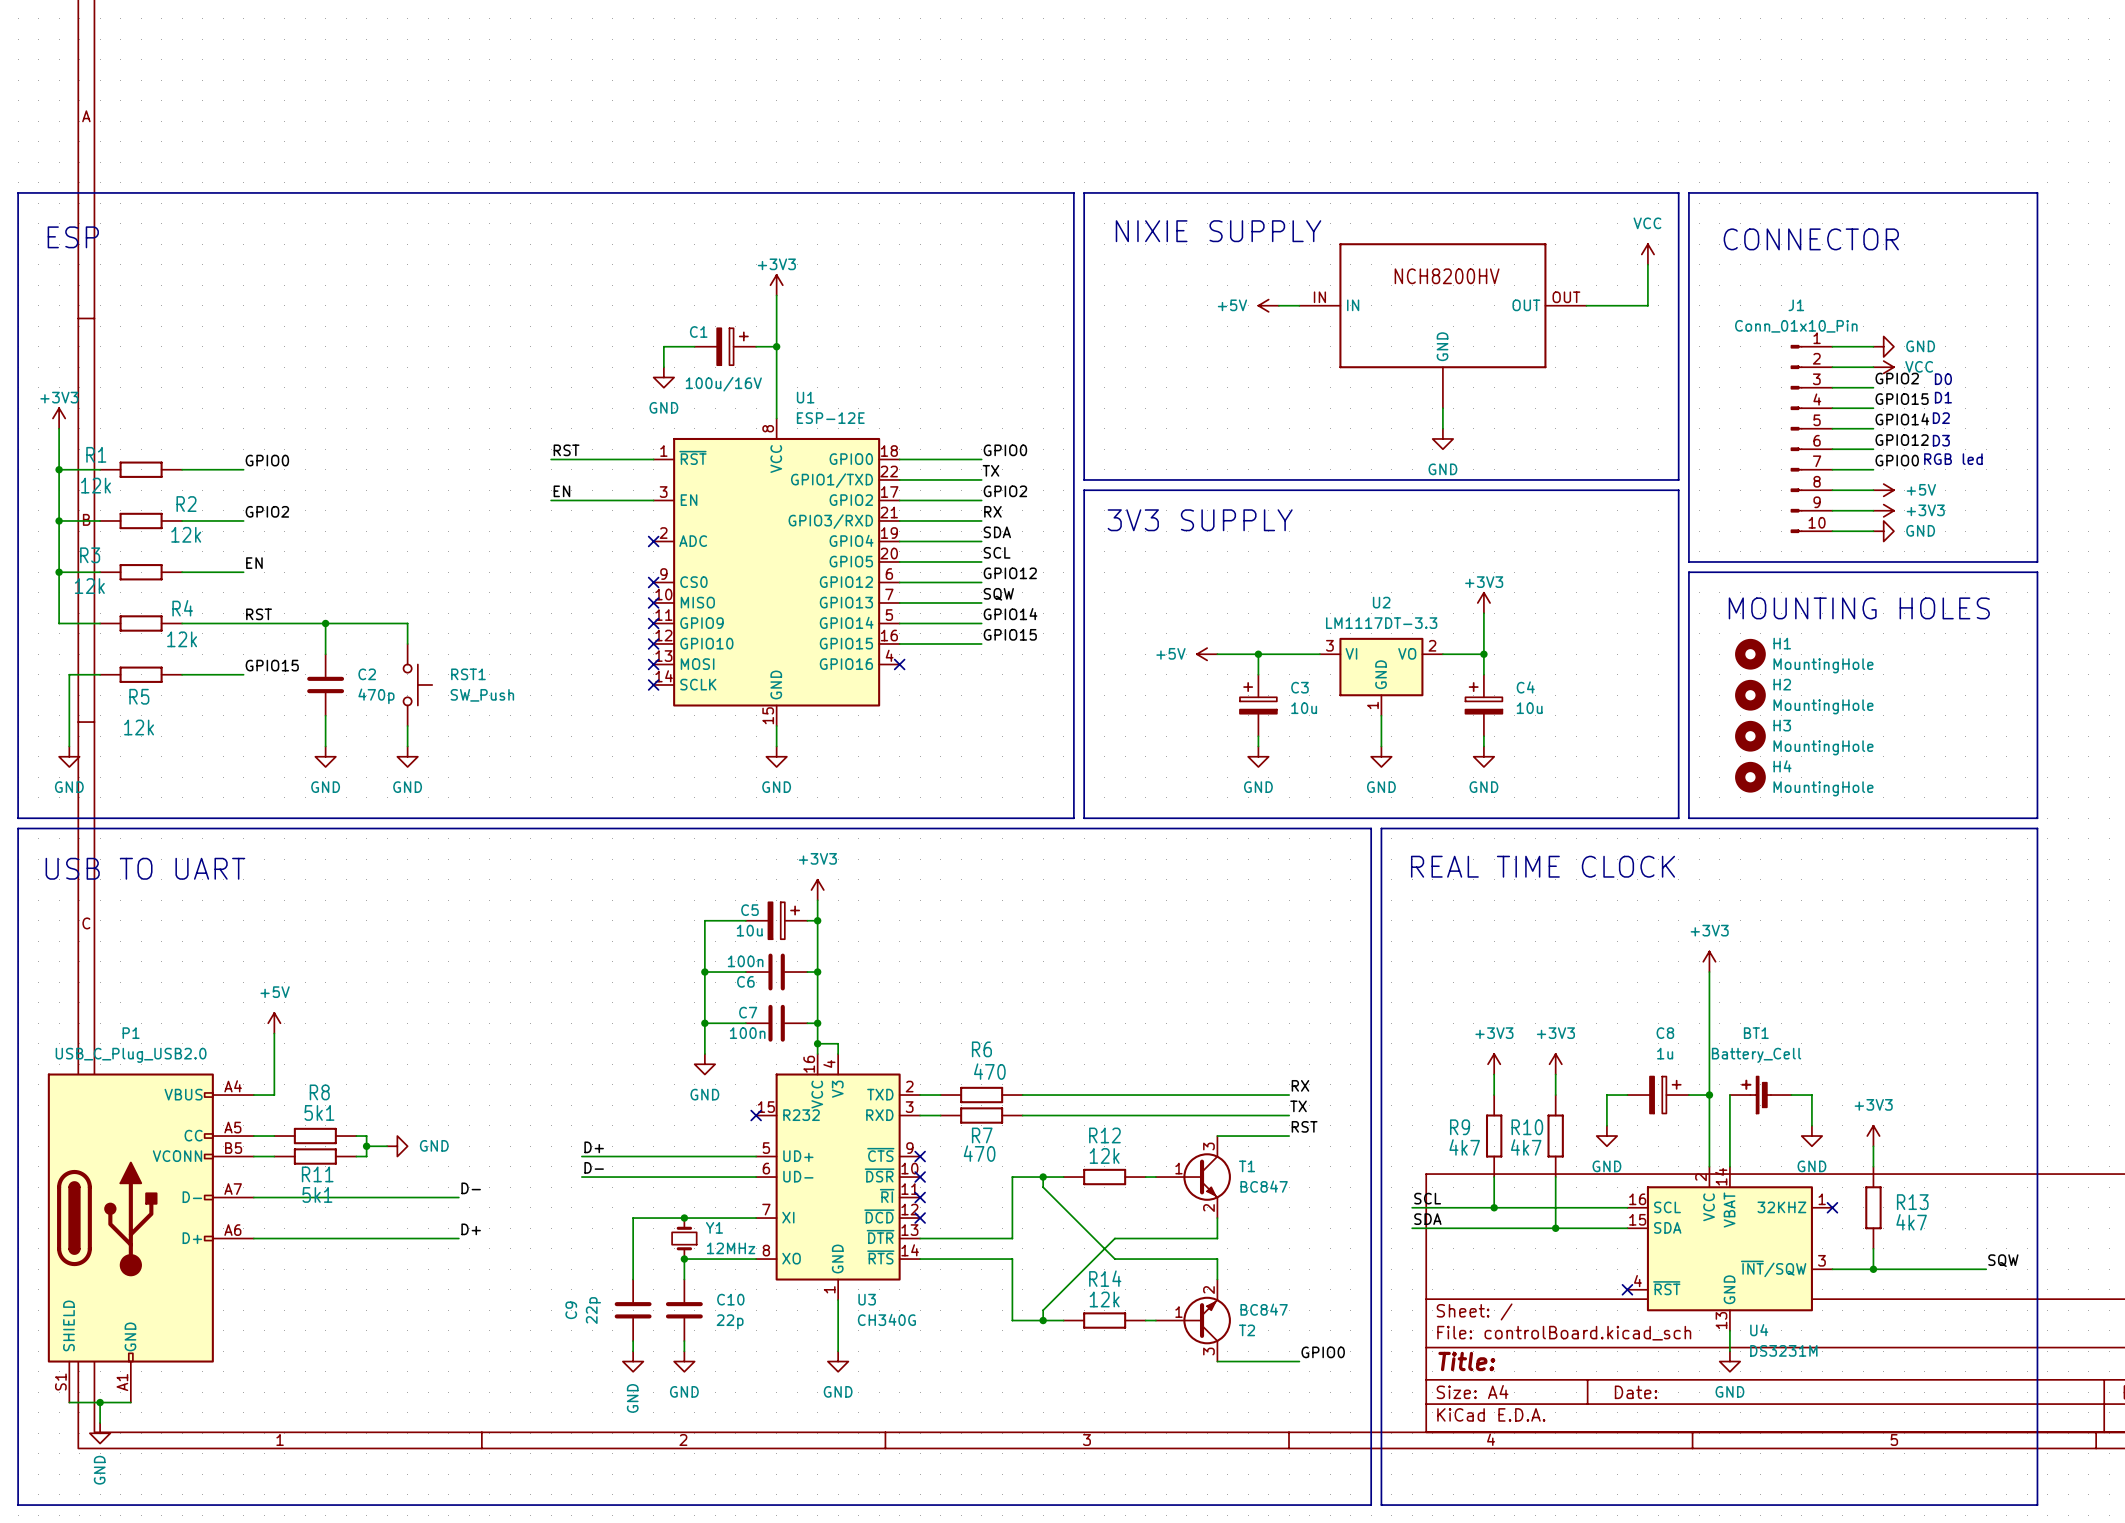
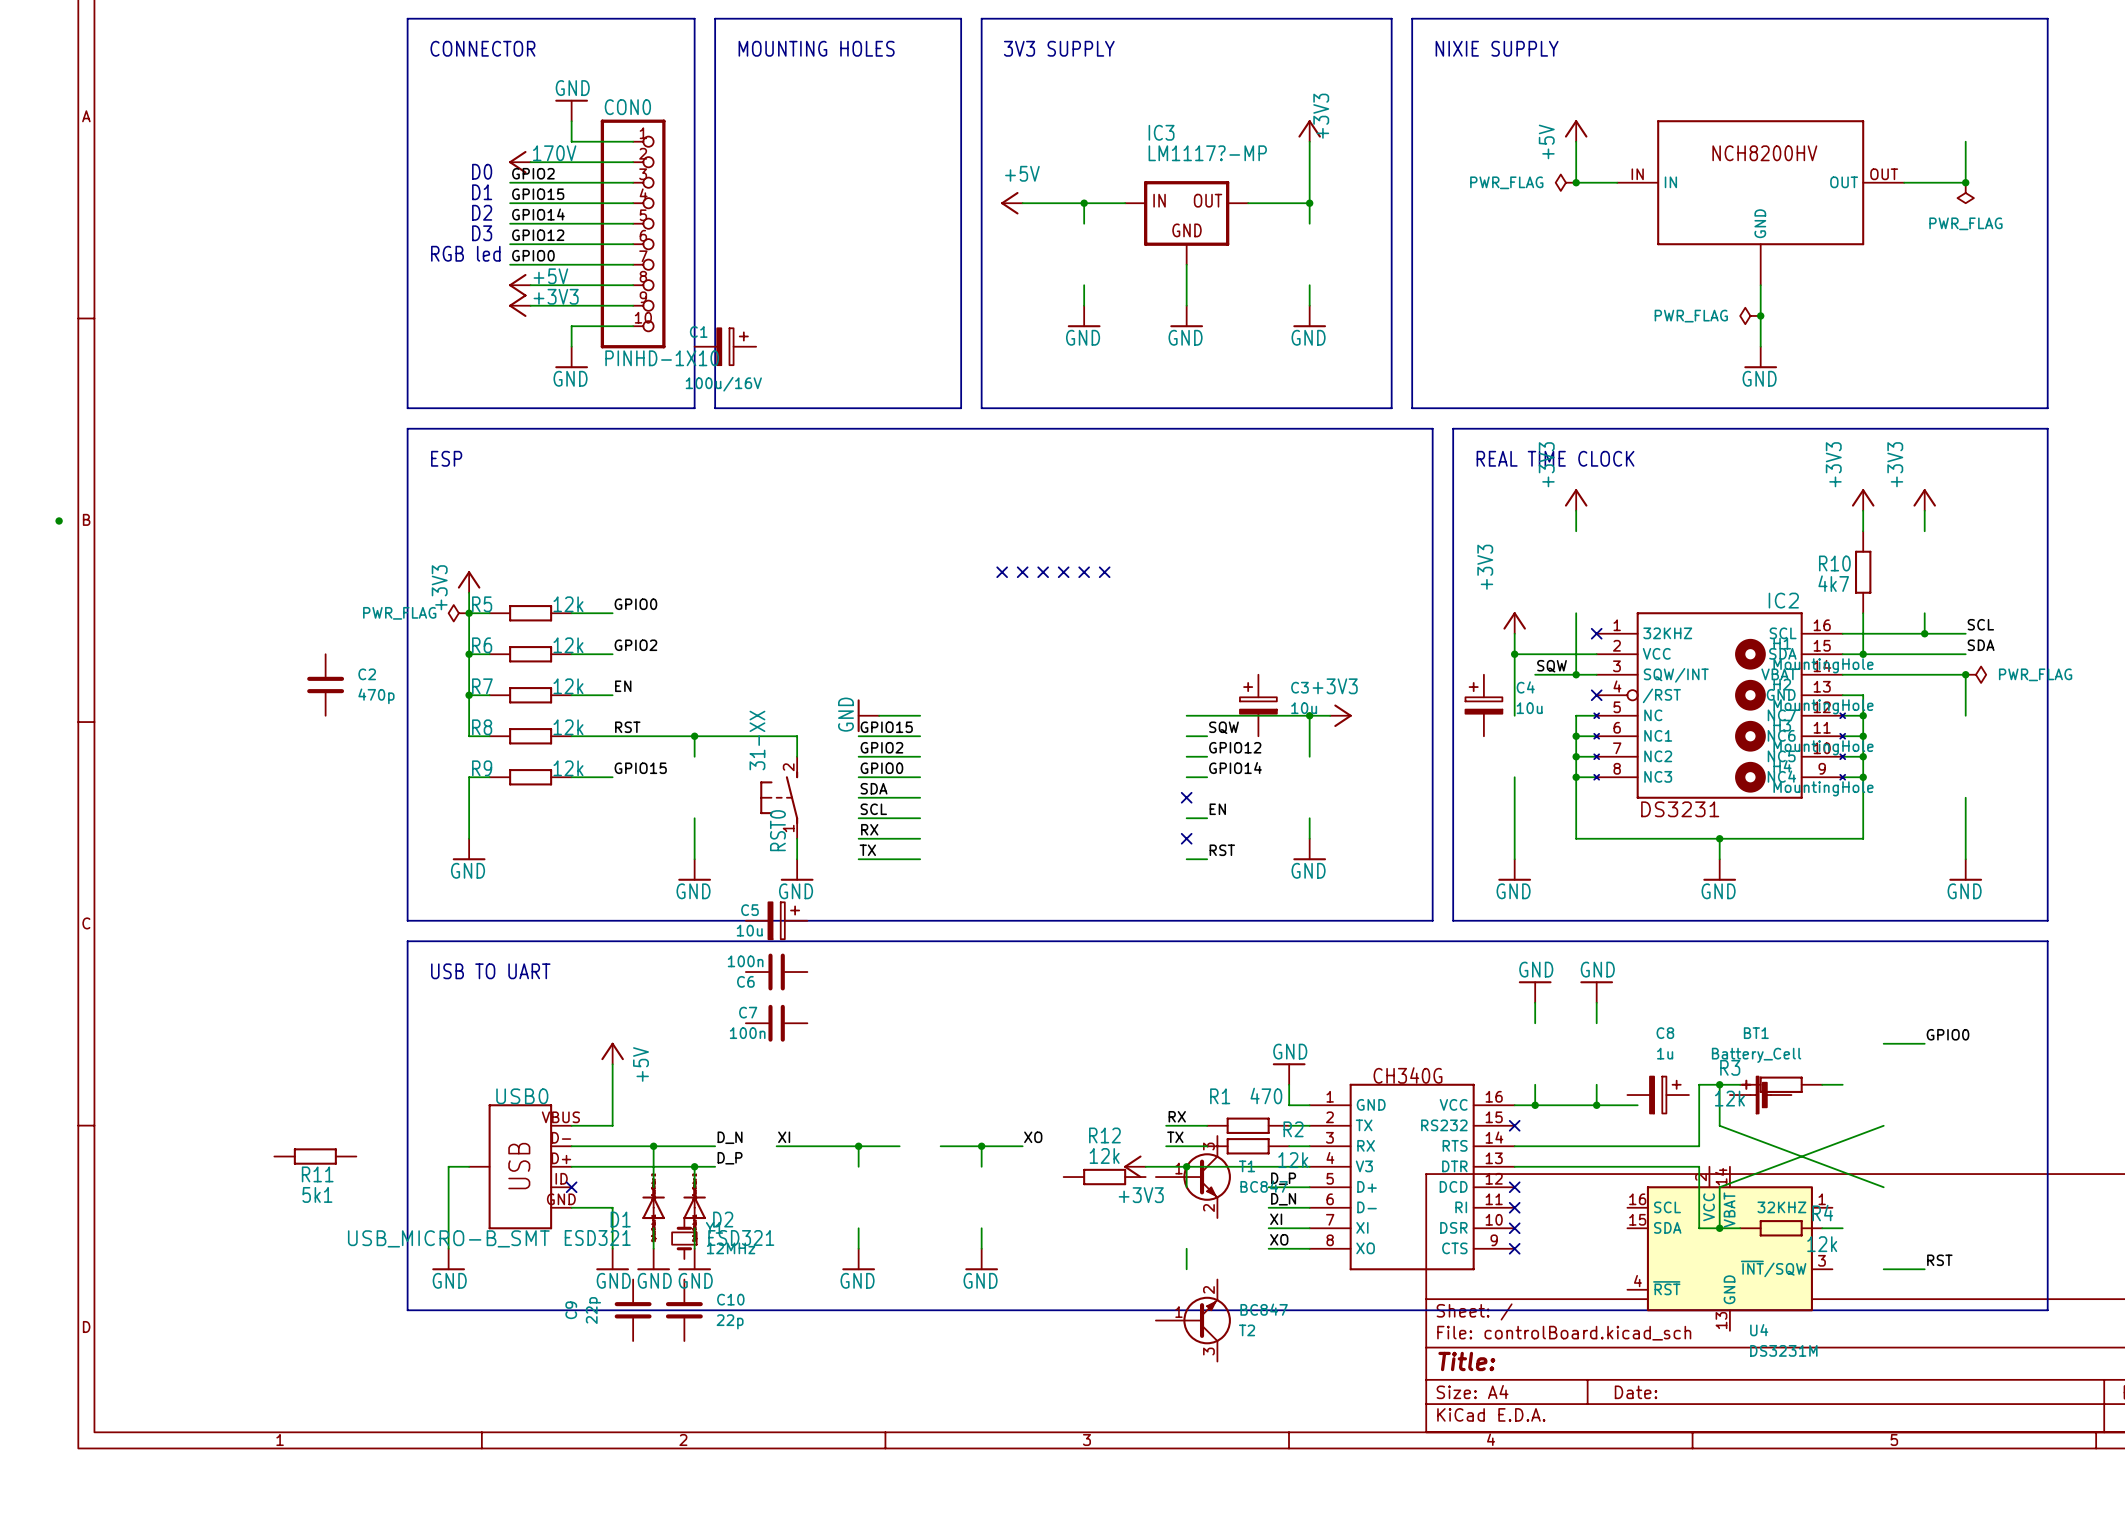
line: none -> (407, 18) (694, 18) (694, 408) (407, 408) (407, 18)
line: none -> (715, 18) (715, 408) (961, 408) (961, 18) (715, 18)
line: none -> (981, 18) (981, 408) (1391, 408) (1391, 18) (981, 18)
line: none -> (1412, 18) (2047, 18) (2047, 408) (1412, 408) (1412, 18)
text: none -> CONNECTOR (482, 48)
text: none -> MOUNTING HOLES (816, 48)
text: none -> 3V3 SUPPLY (1059, 48)
text: none -> NIXIE SUPPLY (1497, 48)
power symbol: none -> GND (571, 110)
wire: none -> (571, 121) (571, 141) (633, 141)
power symbol: none -> +3V3 (1309, 130)
power symbol: none -> +5V (1576, 130)
wire: none -> (1309, 141) (1309, 223)
wire: none -> (1576, 141) (1576, 182) (1617, 182)
wire: none -> (1965, 141) (1965, 182) (1904, 182)
power symbol: none -> 170V (519, 162)
wire: none -> (530, 162) (633, 162)
text: none -> D0 (482, 171)
label: none -> GPIO2 (533, 173)
wire: none -> (510, 182) (633, 182)
power symbol: none -> PWR_FLAG (1565, 182)
junction: none -> (1576, 182)
junction: none -> (1965, 182)
line: (18, 192) (1073, 192) (1073, 818) (18, 818) (18, 192) -> none
text: none -> D1 (482, 192)
line: (1084, 192) (1678, 192) (1678, 479) (1084, 479) (1084, 192) -> none
line: (1688, 192) (2037, 192) (2037, 561) (1688, 561) (1688, 192) -> none
power symbol: none -> PWR_FLAG (1965, 192)
label: none -> GPIO15 (538, 194)
part: none -> (1760, 202)
wire: none -> (510, 203) (633, 203)
power symbol: none -> +5V (1011, 203)
wire: none -> (1022, 203) (1125, 203)
junction: none -> (1084, 203)
wire: none -> (1248, 203) (1309, 203)
junction: none -> (1309, 203)
text: none -> D2 (482, 212)
label: none -> GPIO14 (538, 214)
IC3: none -> LM1117?-MP (1186, 222)
wire: none -> (510, 223) (633, 223)
text: NIXIE SUPPLY (1218, 231) -> none
text: none -> D3 (482, 233)
CON0: none -> PINHD-1X10 (633, 233)
label: none -> GPIO12 (538, 235)
text: ESP (73, 237) -> none
text: CONNECTOR (1811, 239) -> none
wire: none -> (510, 244) (633, 244)
text: none -> RGB led (465, 253)
power symbol: VCC (1647, 254) -> none
label: none -> GPIO0 (533, 255)
wire: none -> (510, 264) (633, 264)
wire: none -> (1186, 264) (1186, 305)
wire: (1647, 264) (1647, 305) (1586, 305) -> none
power symbol: none -> +5V (519, 285)
wire: none -> (530, 285) (633, 285)
power symbol: +3V3 (776, 285) -> none
wire: none -> (1309, 285) (1309, 305)
wire: none -> (1760, 285) (1760, 346)
wire: (776, 295) (776, 418) -> none
power symbol: none -> +3V3 (519, 305)
power symbol: +5V (1268, 305) -> none
wire: (1278, 305) (1299, 305) -> none
power symbol: none -> PWR_FLAG (1750, 315)
junction: none -> (1760, 315)
power symbol: none -> GND (1084, 316)
power symbol: none -> GND (1186, 316)
power symbol: none -> GND (1309, 316)
part: (1442, 325) -> none
wire: none -> (633, 326) (571, 326) (571, 346)
wire: (694, 346) (663, 346) (663, 367) -> none
wire: (756, 346) (776, 346) -> none
junction: (776, 346) -> none
wire: (1832, 346) (1873, 346) -> none
power symbol: GND (1883, 346) -> none
power symbol: none -> GND (571, 357)
power symbol: none -> GND (1760, 357)
wire: (1832, 367) (1873, 367) -> none
power symbol: VCC (1883, 367) -> none
power symbol: GND (663, 377) -> none
label: GPIO2 (1897, 378) -> none
text: D0 (1943, 379) -> none
wire: (1832, 387) (1873, 387) -> none
text: D1 (1943, 397) -> none
label: GPIO15 (1902, 399) -> none
wire: (1442, 408) (1442, 428) -> (1576, 510) (1576, 531)
power symbol: +3V3 (59, 418) -> none
text: D2 (1941, 418) -> none
label: GPIO14 (1902, 419) -> none
wire: (59, 428) (59, 623) (100, 623) -> none
line: none -> (407, 428) (1432, 428) (1432, 920) (407, 920) (407, 428)
line: none -> (1453, 428) (2047, 428) (2047, 920) (1453, 920) (1453, 428)
power symbol: GND (1442, 438) -> none
J1: Conn_01x10_Pin (1811, 438) -> none
label: GPIO12 (1902, 440) -> none
text: D3 (1941, 440) -> none
wire: (1832, 449) (1873, 449) -> none
label: RST (566, 450) -> none
label: GPIO0 (1005, 450) -> none
R1 name position: R1 (96, 454) -> R1 (1220, 1096)
text: none -> ESP (446, 458)
text: none -> REAL TIME CLOCK (1555, 458)
wire: (551, 459) (653, 459) -> (530, 305) (633, 305)
wire: (899, 459) (981, 459) -> none
text: RGB led (1953, 459) -> none
label: GPIO0 (267, 460) -> none
label: GPIO0 (1897, 460) -> none
wire: (59, 469) (100, 469) -> none
junction: (59, 469) -> none
R1 position: (141, 469) -> (1248, 1125)
wire: (182, 469) (243, 469) -> none
wire: (1832, 469) (1873, 469) -> none
label: TX (991, 470) -> none
wire: (899, 479) (981, 479) -> none
R1 value: 12k (95, 485) -> 470 (1266, 1095)
line: (1084, 490) (1084, 818) (1678, 818) (1678, 490) (1084, 490) -> none
wire: (1832, 490) (1873, 490) -> none
power symbol: +5V (1883, 490) -> none
label: EN (561, 491) -> none
label: GPIO2 (1005, 491) -> none
power symbol: none -> +3V3 (1576, 499)
power symbol: none -> +3V3 (1863, 499)
power symbol: none -> +3V3 (1924, 499)
wire: (551, 500) (653, 500) -> none
wire: (899, 500) (981, 500) -> none
wire: (1832, 510) (1873, 510) -> none
wire: none -> (1863, 510) (1863, 531)
power symbol: +3V3 (1883, 510) -> none
wire: none -> (1924, 510) (1924, 531)
label: GPIO2 (267, 511) -> none
label: RX (992, 511) -> none
wire: (59, 520) (100, 520) -> none
R2 position: (141, 520) -> (1248, 1146)
wire: (182, 520) (243, 520) -> none
wire: (899, 520) (981, 520) -> none
text: 3V3 SUPPLY (1200, 520) -> none
wire: (1832, 531) (1873, 531) -> none
power symbol: GND (1883, 531) -> none
label: SDA (997, 532) -> none
no-connect mark: (653, 541) -> none
wire: (899, 541) (981, 541) -> none
label: SCL (997, 552) -> none
wire: (899, 561) (981, 561) -> none
label: EN (254, 563) -> none
wire: (59, 572) (100, 572) -> none
junction: (59, 572) -> none
R3 position: (141, 572) -> (1781, 1084)
wire: (182, 572) (243, 572) -> none
U1: ESP-12E (776, 572) -> none
no-connect mark: none -> (1002, 572)
no-connect mark: none -> (1022, 572)
no-connect mark: none -> (1043, 572)
no-connect mark: none -> (1063, 572)
no-connect mark: none -> (1084, 572)
no-connect mark: none -> (1104, 572)
line: (1688, 572) (1688, 818) (2037, 818) (2037, 572) (1688, 572) -> none
label: GPIO12 (1010, 573) -> none
power symbol: none -> +3V3 (469, 581)
no-connect mark: (653, 582) -> none
wire: (899, 582) (981, 582) -> none
wire: none -> (469, 592) (469, 736) (489, 736)
label: SQW (998, 594) -> none
no-connect mark: (653, 602) -> none
wire: (899, 602) (981, 602) -> none
power symbol: +3V3 (1483, 602) -> none
label: none -> GPIO0 (635, 604)
text: MOUNTING HOLES (1859, 608) -> none
power symbol: none -> PWR_FLAG (458, 613)
wire: none -> (469, 613) (489, 613)
junction: none -> (469, 613)
wire: none -> (571, 613) (612, 613)
wire: (1483, 613) (1483, 674) -> (1576, 613) (1576, 674)
wire: none -> (1863, 613) (1863, 654)
wire: none -> (1924, 613) (1924, 633)
label: RST (259, 614) -> none
label: GPIO14 (1010, 614) -> none
power symbol: none -> +3V3 (1514, 622)
R4 position: (141, 623) -> (1781, 1228)
wire: (182, 623) (407, 623) (407, 643) -> none
wire: (325, 623) (325, 654) -> none
junction: (325, 623) -> none
no-connect mark: (653, 623) -> none
wire: (899, 623) (981, 623) -> none
label: none -> SCL (1980, 624)
wire: none -> (1514, 633) (1514, 715)
no-connect mark: none -> (1596, 633)
wire: none -> (1842, 633) (1965, 633)
junction: none -> (1924, 633)
label position: GPIO15 (1010, 634) -> GPIO15 (886, 727)
no-connect mark: (653, 643) -> none
wire: (899, 643) (981, 643) -> none
label: none -> GPIO2 (635, 645)
label: none -> SDA (1981, 645)
wire: none -> (469, 654) (489, 654)
junction: none -> (469, 654)
wire: none -> (571, 654) (612, 654)
power symbol: +5V (1207, 654) -> none
wire: (1217, 654) (1319, 654) -> none
wire: (1258, 654) (1258, 674) -> (1309, 818) (1309, 838)
junction: (1258, 654) -> none
wire: (1442, 654) (1483, 654) -> none
junction position: (1483, 654) -> (1514, 654)
wire: none -> (1514, 654) (1596, 654)
wire: none -> (1842, 654) (1965, 654)
junction: none -> (1863, 654)
no-connect mark: (653, 664) -> none
no-connect mark: (899, 664) -> none
label: GPIO15 (272, 665) -> none
label: none -> SQW (1552, 666)
wire: (100, 674) (69, 674) (69, 746) -> none
R5 position: (141, 674) -> (530, 613)
wire: (182, 674) (243, 674) -> none
wire: none -> (1535, 674) (1596, 674)
junction: none -> (1576, 674)
wire: none -> (1842, 674) (1965, 674) (1965, 715)
junction: none -> (1965, 674)
power symbol: none -> PWR_FLAG (1975, 674)
U2: LM1117DT-3.3 (1381, 676) -> none
RST1: SW_Push (417, 684) -> none
no-connect mark: (653, 684) -> none
label: none -> EN (623, 686)
wire: none -> (469, 695) (489, 695)
junction: none -> (469, 695)
wire: none -> (571, 695) (612, 695)
no-connect mark: none -> (1596, 695)
wire: none -> (1842, 695) (1863, 695) (1863, 838) (1576, 838) (1576, 715) (1596, 715)
R5 name position: R5 (139, 696) -> R5 (482, 604)
IC2: none -> (1719, 705)
wire: (325, 715) (325, 746) -> none
power symbol: none -> GND (868, 715)
wire: none -> (879, 715) (920, 715)
wire: none -> (1186, 715) (1330, 715)
wire: none -> (1309, 715) (1309, 756)
junction: none -> (1309, 715)
power symbol: none -> +3V3 (1340, 715)
wire: (1381, 715) (1381, 746) -> none
wire: none -> (1842, 715) (1863, 715)
junction: none -> (1863, 715)
wire: (776, 726) (776, 746) -> (694, 736) (694, 756)
R5 value position: 12k (139, 727) -> 12k (568, 604)
label: none -> RST (627, 727)
label: none -> SQW (1223, 727)
wire: none -> (571, 736) (797, 736) (797, 756)
junction: none -> (694, 736)
wire: none -> (858, 736) (920, 736)
wire: none -> (1186, 736) (1207, 736)
wire: (1258, 736) (1258, 746) -> none
wire: (1483, 736) (1483, 746) -> none
wire: none -> (1576, 736) (1596, 736)
junction: none -> (1576, 736)
wire: none -> (1842, 736) (1863, 736)
junction: none -> (1863, 736)
label: none -> GPIO2 (881, 747)
label: none -> GPIO12 (1235, 747)
power symbol: GND (69, 756) -> none
power symbol: GND (325, 756) -> none
power symbol: GND (407, 756) -> none
power symbol: GND (776, 756) -> none
wire: none -> (858, 756) (920, 756)
wire: none -> (1186, 756) (1207, 756)
power symbol: GND (1258, 756) -> none
power symbol: GND (1381, 756) -> none
power symbol: GND (1483, 756) -> none
wire: none -> (1576, 756) (1596, 756)
junction: none -> (1576, 756)
wire: none -> (1842, 756) (1863, 756)
junction: none -> (1863, 756)
label: none -> GPIO15 (640, 768)
label: none -> GPIO0 (881, 768)
label: none -> GPIO14 (1235, 768)
wire: none -> (489, 777) (469, 777) (469, 838)
wire: none -> (571, 777) (612, 777)
wire: none -> (858, 777) (920, 777)
wire: none -> (1186, 777) (1207, 777)
wire: none -> (1514, 777) (1514, 859)
wire: none -> (1576, 777) (1596, 777)
junction: none -> (1576, 777)
wire: none -> (1842, 777) (1863, 777)
junction: none -> (1863, 777)
label: none -> SDA (874, 788)
RST0: none -> 31-XX (779, 797)
wire: none -> (858, 797) (920, 797)
no-connect mark: none -> (1186, 797)
wire: none -> (1965, 797) (1965, 859)
label: none -> SCL (873, 809)
label: none -> EN (1217, 809)
wire: none -> (694, 818) (694, 859)
line: (18, 828) (1371, 828) (1371, 1505) (18, 1505) (18, 828) -> none
line: (1381, 828) (2037, 828) (2037, 1505) (1381, 1505) (1381, 828) -> none
label: none -> RX (869, 829)
wire: none -> (797, 838) (797, 859)
wire: none -> (858, 838) (920, 838)
no-connect mark: none -> (1186, 838)
wire: none -> (1719, 838) (1719, 859)
junction: none -> (1719, 838)
power symbol: none -> GND (469, 849)
power symbol: none -> GND (1309, 849)
label: none -> TX (867, 850)
label: none -> RST (1222, 850)
wire: none -> (858, 859) (920, 859)
wire: none -> (1186, 859) (1207, 859)
text: REAL TIME CLOCK (1543, 866) -> none
text: USB TO UART (145, 868) -> none
power symbol: none -> GND (694, 870)
power symbol: none -> GND (797, 870)
power symbol: none -> GND (1514, 870)
power symbol: none -> GND (1719, 870)
power symbol: none -> GND (1965, 870)
power symbol: +3V3 (817, 890) -> none
wire: (817, 900) (817, 1054) -> none
wire: (745, 920) (704, 920) (704, 1054) -> none
junction: (817, 920) -> none
line: none -> (407, 941) (2047, 941) (2047, 1310) (407, 1310) (407, 941)
power symbol: +3V3 (1709, 961) -> none
text: none -> USB TO UART (490, 971)
wire: (704, 972) (745, 972) -> none
junction: (704, 972) -> none
wire: (807, 972) (817, 972) -> none
junction: (817, 972) -> none
wire: (1709, 972) (1709, 1166) -> none
power symbol: none -> GND (1535, 992)
power symbol: none -> GND (1596, 992)
wire: none -> (1535, 1002) (1535, 1023)
wire: none -> (1596, 1002) (1596, 1023)
power symbol: +5V (274, 1023) -> none
wire: (704, 1023) (745, 1023) -> none
junction: (704, 1023) -> none
wire: (807, 1023) (817, 1023) -> none
junction: (817, 1023) -> none
wire: (274, 1033) (274, 1095) (253, 1095) -> none
label: none -> GPIO0 (1947, 1034)
wire: (817, 1043) (838, 1043) (838, 1054) -> none
junction: (817, 1043) -> none
wire: none -> (1883, 1043) (1924, 1043)
R6 name position: R6 (981, 1049) -> R6 (482, 645)
power symbol: none -> +5V (612, 1053)
wire: none -> (612, 1064) (612, 1125) (571, 1125)
power symbol: GND (704, 1064) -> none
power symbol: +3V3 (1494, 1064) -> none
power symbol: +3V3 (1555, 1064) -> none
R6 value: 470 (989, 1071) -> 12k (568, 645)
power symbol: none -> GND (1289, 1074)
wire: (1494, 1074) (1494, 1095) -> (1535, 1084) (1535, 1105)
wire: (1555, 1074) (1555, 1095) -> (1596, 1084) (1596, 1105)
wire: none -> (1289, 1084) (1289, 1105) (1309, 1105)
wire: none -> (1719, 1084) (1719, 1125) (1883, 1187)
wire: none -> (1740, 1084) (1699, 1084) (1699, 1146) (1514, 1146)
label position: RX (1300, 1085) -> RX (1177, 1116)
R8 name position: R8 (319, 1092) -> R8 (482, 727)
wire: (920, 1095) (940, 1095) -> none
R6 position: (981, 1095) -> (530, 654)
wire: (1022, 1095) (1289, 1095) -> none
wire: (1627, 1095) (1606, 1095) (1606, 1125) -> none
wire: (1688, 1095) (1709, 1095) -> (1822, 1084) (1842, 1084)
junction position: (1709, 1095) -> (1719, 1084)
wire: (1729, 1095) (1729, 1166) -> none
wire: (1791, 1095) (1811, 1095) (1811, 1125) -> none
wire: none -> (1514, 1105) (1637, 1105)
junction: none -> (1535, 1105)
junction: none -> (1596, 1105)
label position: TX (1298, 1106) -> TX (1175, 1137)
R8 value: 5k1 (319, 1112) -> 12k (568, 727)
no-connect mark: (756, 1115) -> none
wire: (920, 1115) (940, 1115) -> none
R7 position: (981, 1115) -> (530, 695)
wire: (1022, 1115) (1289, 1115) -> none
wire: none -> (1166, 1125) (1207, 1125)
wire: none -> (1289, 1125) (1309, 1125)
no-connect mark: none -> (1514, 1125)
wire: none -> (1883, 1125) (1719, 1187) (1719, 1228)
label: RST (1304, 1126) -> none
R7 name position: R7 (982, 1135) -> R7 (482, 686)
wire: (253, 1136) (274, 1136) -> none
R8 position: (315, 1136) -> (530, 736)
wire: (356, 1136) (366, 1136) (366, 1156) (356, 1156) -> none
wire: (1217, 1136) (1289, 1136) -> none
R9 rotation: 0° (1494, 1136) -> 90° clockwise (530, 777)
R9 position: (1494, 1136) -> (530, 777)
R10 position: (1555, 1136) -> (1863, 572)
power symbol: GND (1606, 1136) -> none
power symbol: GND (1811, 1136) -> none
power symbol: +3V3 (1873, 1136) -> none
label: none -> D_N (730, 1137)
label: none -> XI (784, 1137)
label: none -> XO (1033, 1137)
wire: (366, 1146) (387, 1146) -> none
junction: (366, 1146) -> none
power symbol: GND (397, 1146) -> none
wire: none -> (571, 1146) (715, 1146)
wire: none -> (653, 1146) (653, 1187)
junction: none -> (653, 1146)
junction: none -> (858, 1146)
wire: none -> (940, 1146) (1022, 1146)
wire: none -> (981, 1146) (981, 1166)
junction: none -> (981, 1146)
wire: none -> (1166, 1146) (1207, 1146)
wire: none -> (1289, 1146) (1309, 1146)
wire: (1873, 1146) (1873, 1166) -> none
label: D+ (594, 1147) -> none
R9 value: 4k7 (1464, 1147) -> 12k (568, 768)
R7 value: 470 (979, 1153) -> 12k (568, 686)
wire: (253, 1156) (274, 1156) -> none
wire: (581, 1156) (756, 1156) -> none
no-connect mark: (920, 1156) -> none
label: none -> D_P (730, 1158)
wire: none -> (469, 1166) (448, 1166) (448, 1248)
USB0: none -> USB_MICRO-B_SMT (520, 1166)
wire: none -> (571, 1166) (715, 1166)
wire: none -> (694, 1166) (694, 1187)
junction: none -> (694, 1166)
power symbol: none -> +3V3 (1134, 1166)
wire: none -> (1145, 1166) (1309, 1166)
wire: none -> (1186, 1166) (1186, 1187)
junction: none -> (1186, 1166)
wire: none -> (1514, 1166) (1699, 1166) (1699, 1228) (1740, 1228)
label: D- (594, 1167) -> none
wire: (581, 1177) (756, 1177) -> none
U3: CH340G (838, 1177) -> none
no-connect mark: (920, 1177) -> none
wire: (1043, 1177) (1043, 1187) (1114, 1259) (1217, 1259) (1217, 1279) -> none
junction: (1043, 1177) -> none
wire: (1063, 1177) (1012, 1177) (1012, 1238) (920, 1238) -> none
wire: (1145, 1177) (1155, 1177) -> none
part: none -> (1412, 1177)
wire: (1494, 1177) (1494, 1207) -> none
wire: (1555, 1177) (1555, 1228) -> none
label: none -> D_P (1283, 1178)
no-connect mark: none -> (571, 1187)
wire: none -> (1268, 1187) (1309, 1187)
no-connect mark: none -> (1514, 1187)
label: D- (471, 1188) -> none
wire: (253, 1197) (458, 1197) -> none
no-connect mark: (920, 1197) -> none
label: SCL (1427, 1198) -> none
label: none -> D_N (1283, 1199)
wire: none -> (571, 1207) (612, 1207) (612, 1248)
D1: none -> ESD321 (653, 1207)
D2: none -> ESD321 (694, 1207)
wire: none -> (1268, 1207) (1309, 1207)
wire: (1412, 1207) (1627, 1207) -> none
junction: (1494, 1207) -> none
no-connect mark: none -> (1514, 1207)
no-connect mark: (1832, 1207) -> none
R13: 4k7 (1873, 1207) -> none
junction: (684, 1218) -> none
wire: (756, 1218) (633, 1218) (633, 1279) -> none
no-connect mark: (920, 1218) -> none
wire: (1217, 1218) (1217, 1238) (1114, 1238) (1043, 1310) (1043, 1320) -> none
label: none -> XI (1276, 1219)
label: SDA (1427, 1219) -> none
wire: none -> (653, 1228) (653, 1248)
wire: none -> (694, 1228) (694, 1248)
wire: none -> (981, 1228) (981, 1248)
wire: none -> (1268, 1228) (1309, 1228)
wire: (1412, 1228) (1627, 1228) -> none
no-connect mark: none -> (1514, 1228)
junction: (1555, 1228) -> none
junction: none -> (1719, 1228)
wire: none -> (1822, 1228) (1842, 1228)
label: D+ (471, 1229) -> none
P1: USB_C_Plug_USB2.0 (150, 1238) -> none
wire: (253, 1238) (458, 1238) -> none
label: none -> XO (1279, 1239)
wire: none -> (1186, 1248) (1186, 1269)
wire: none -> (1268, 1248) (1309, 1248)
no-connect mark: none -> (1514, 1248)
wire: (1873, 1248) (1873, 1269) -> none
power symbol: none -> GND (448, 1259)
power symbol: none -> GND (612, 1259)
power symbol: none -> GND (653, 1259)
junction: (684, 1259) -> none
power symbol: none -> GND (694, 1259)
wire: (756, 1259) (684, 1259) (684, 1279) -> none
power symbol: none -> GND (858, 1259)
wire: (920, 1259) (1012, 1259) (1012, 1320) (1063, 1320) -> none
power symbol: none -> GND (981, 1259)
label: none -> RST (1939, 1260)
label: SQW (2003, 1260) -> none
wire: (1832, 1269) (1883, 1269) -> none
junction: (1873, 1269) -> none
wire: (1924, 1269) (1986, 1269) -> none
no-connect mark: (1627, 1289) -> none
wire: (838, 1300) (838, 1351) -> none
junction: (1043, 1320) -> none
R14: 12k (1104, 1320) -> none
wire: (1145, 1320) (1155, 1320) -> none
wire: (1729, 1330) (1729, 1351) -> none
wire: (633, 1341) (633, 1351) -> none
wire: (684, 1341) (684, 1351) -> none
label: GPIO0 (1323, 1352) -> none
power symbol: GND (633, 1361) -> none
power symbol: GND (684, 1361) -> none
power symbol: GND (838, 1361) -> none
wire: (1217, 1361) (1299, 1361) -> none
power symbol: GND (1729, 1361) -> none
wire: (69, 1402) (130, 1402) -> none
wire: (100, 1402) (100, 1423) -> none
junction: (100, 1402) -> none
power symbol: GND (100, 1433) -> none

